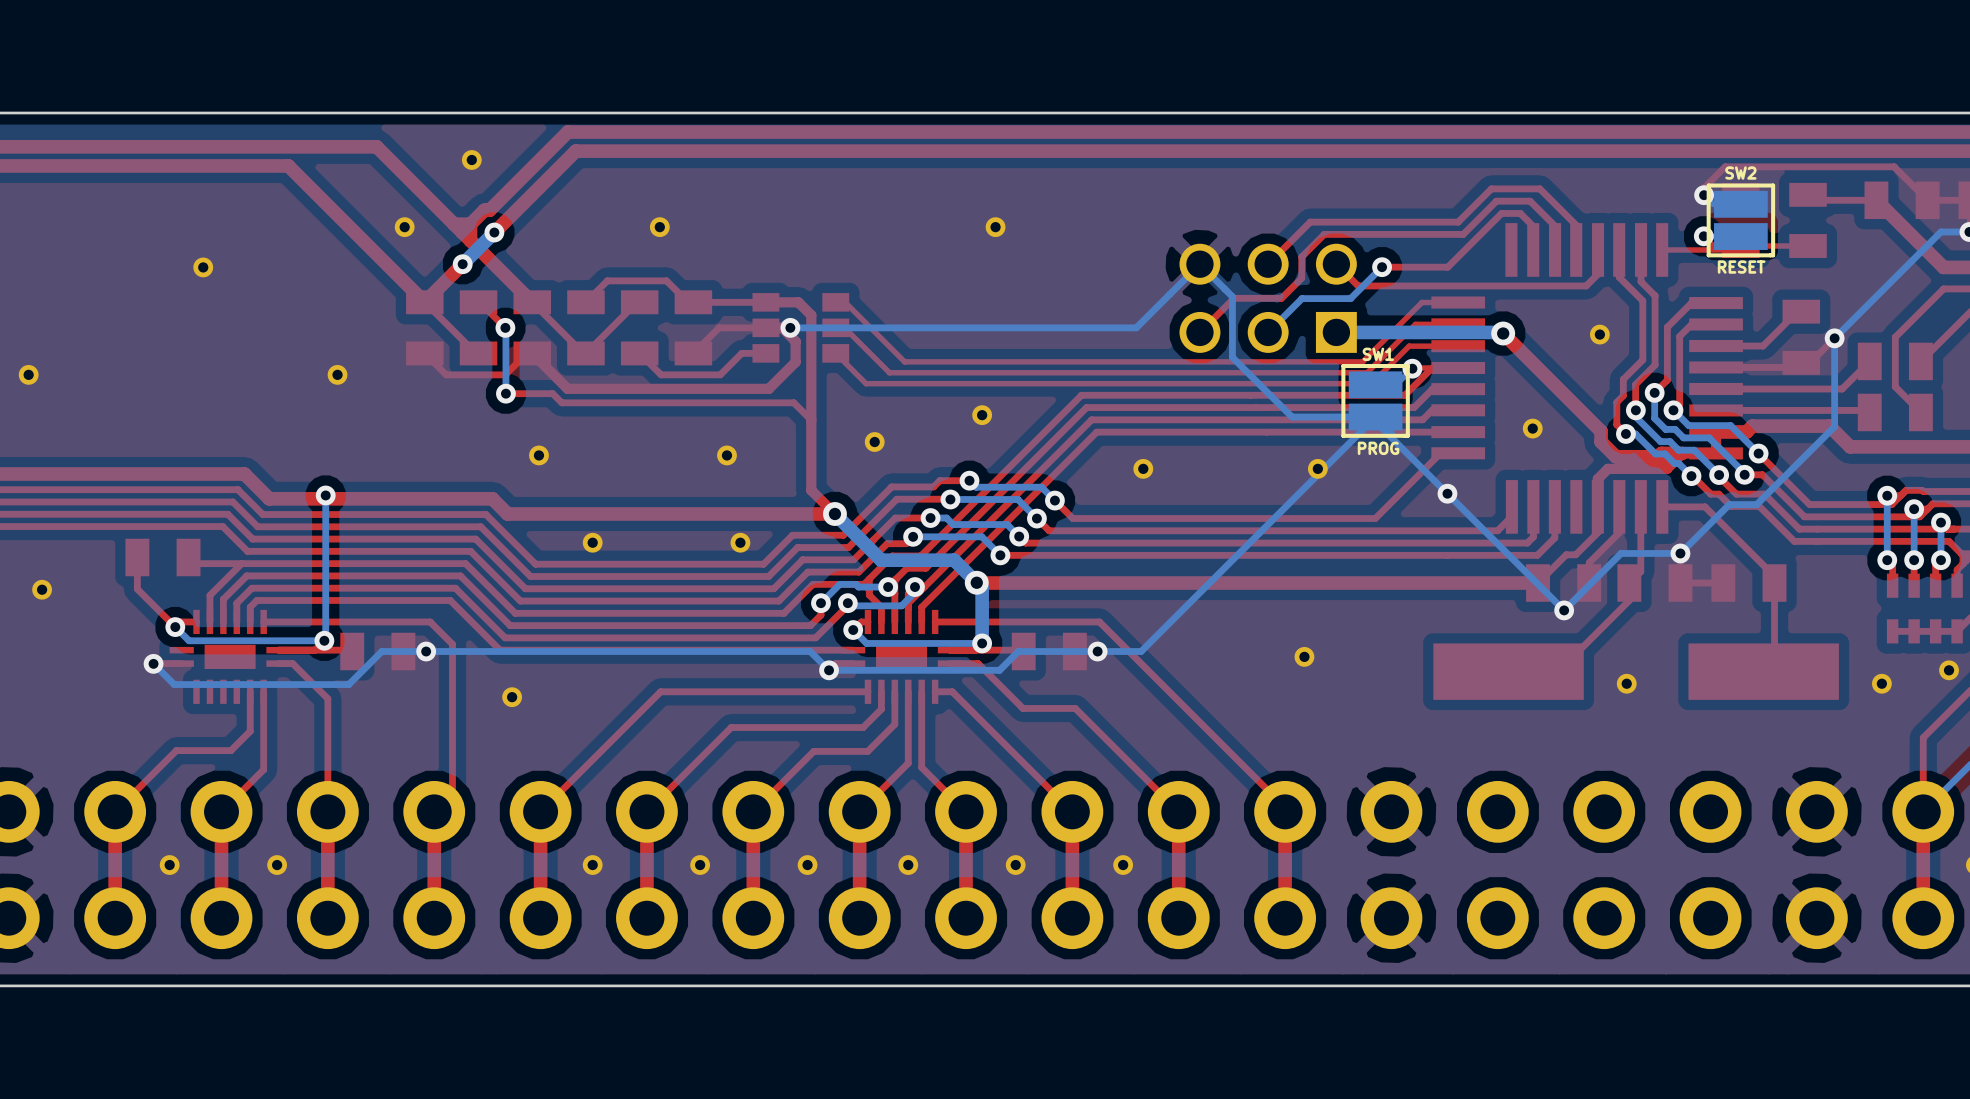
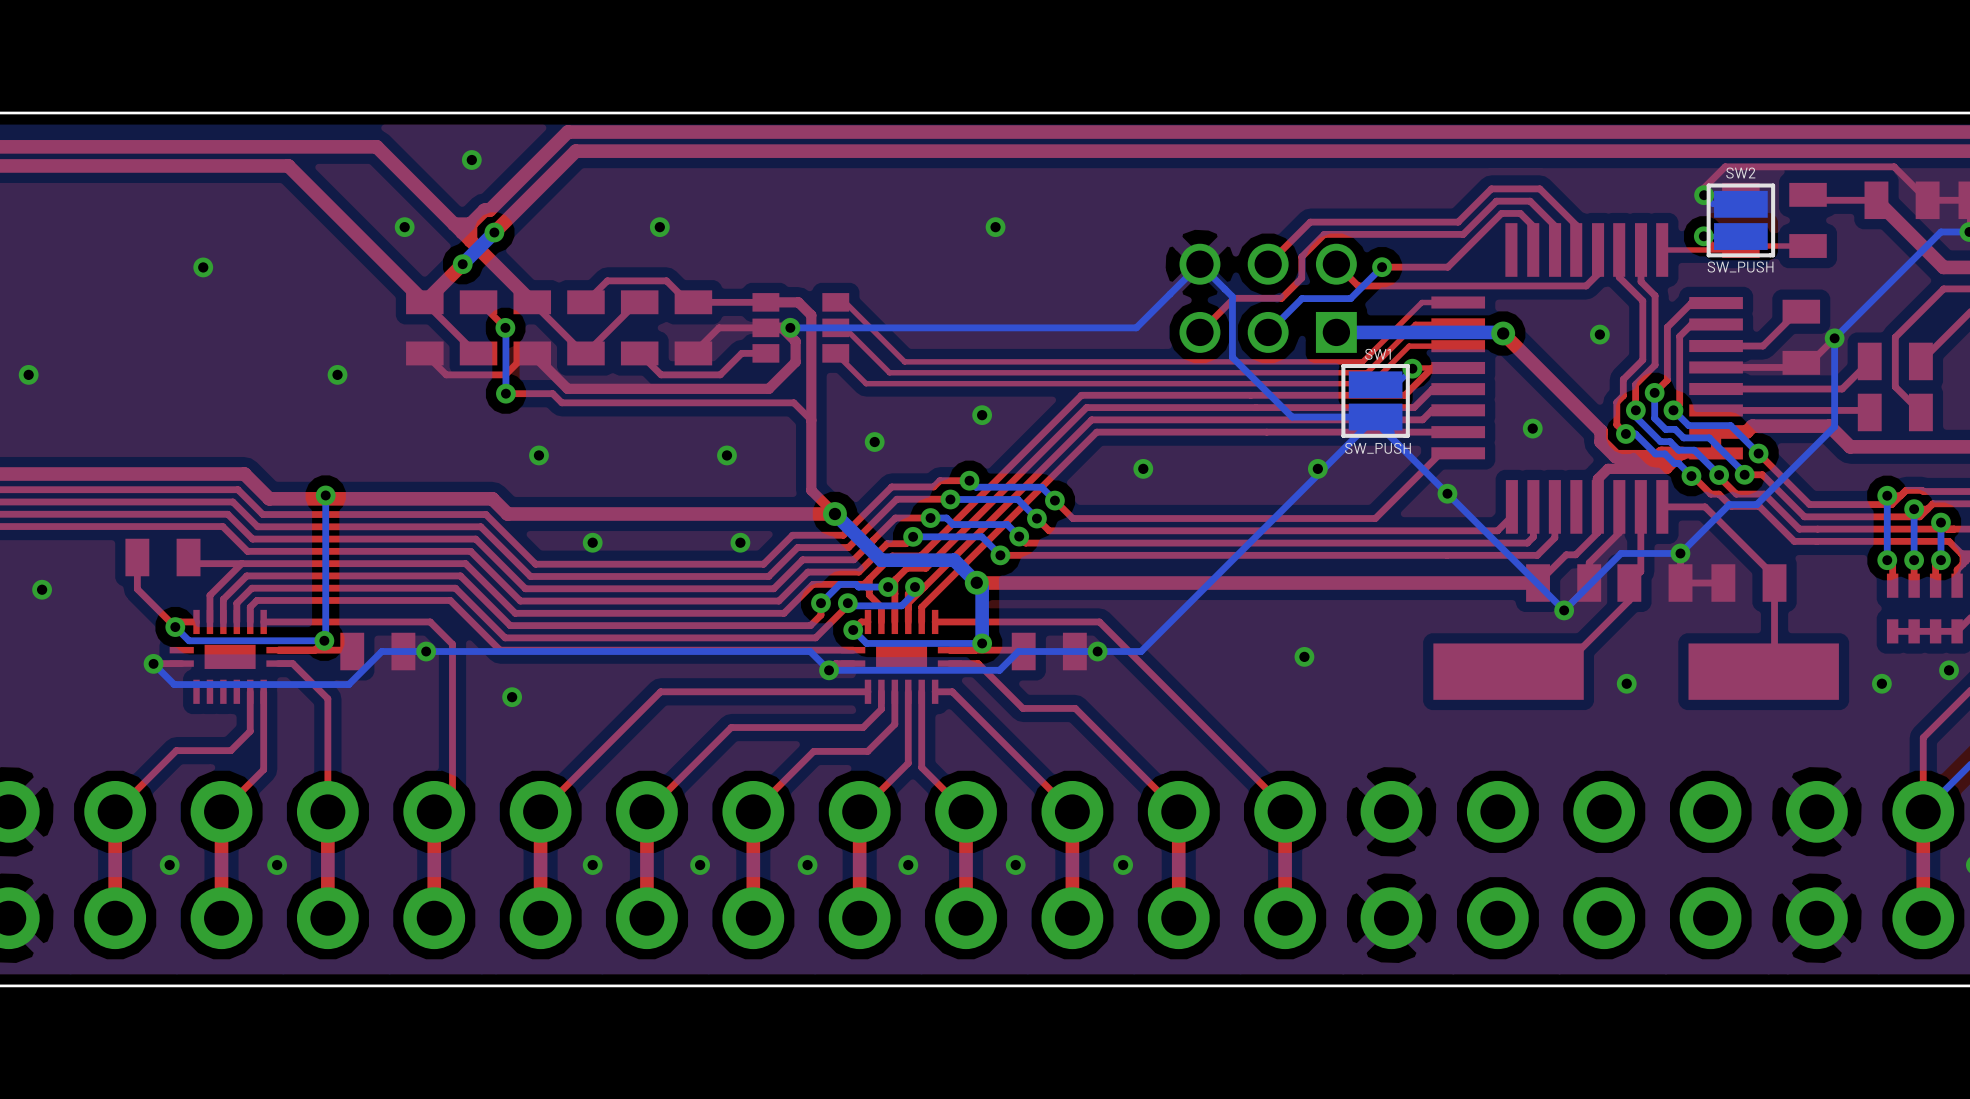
SW2 value: RESET (1741, 267) -> SW_PUSH (1740, 267)
SW1 value: PROG (1378, 448) -> SW_PUSH (1378, 448)

